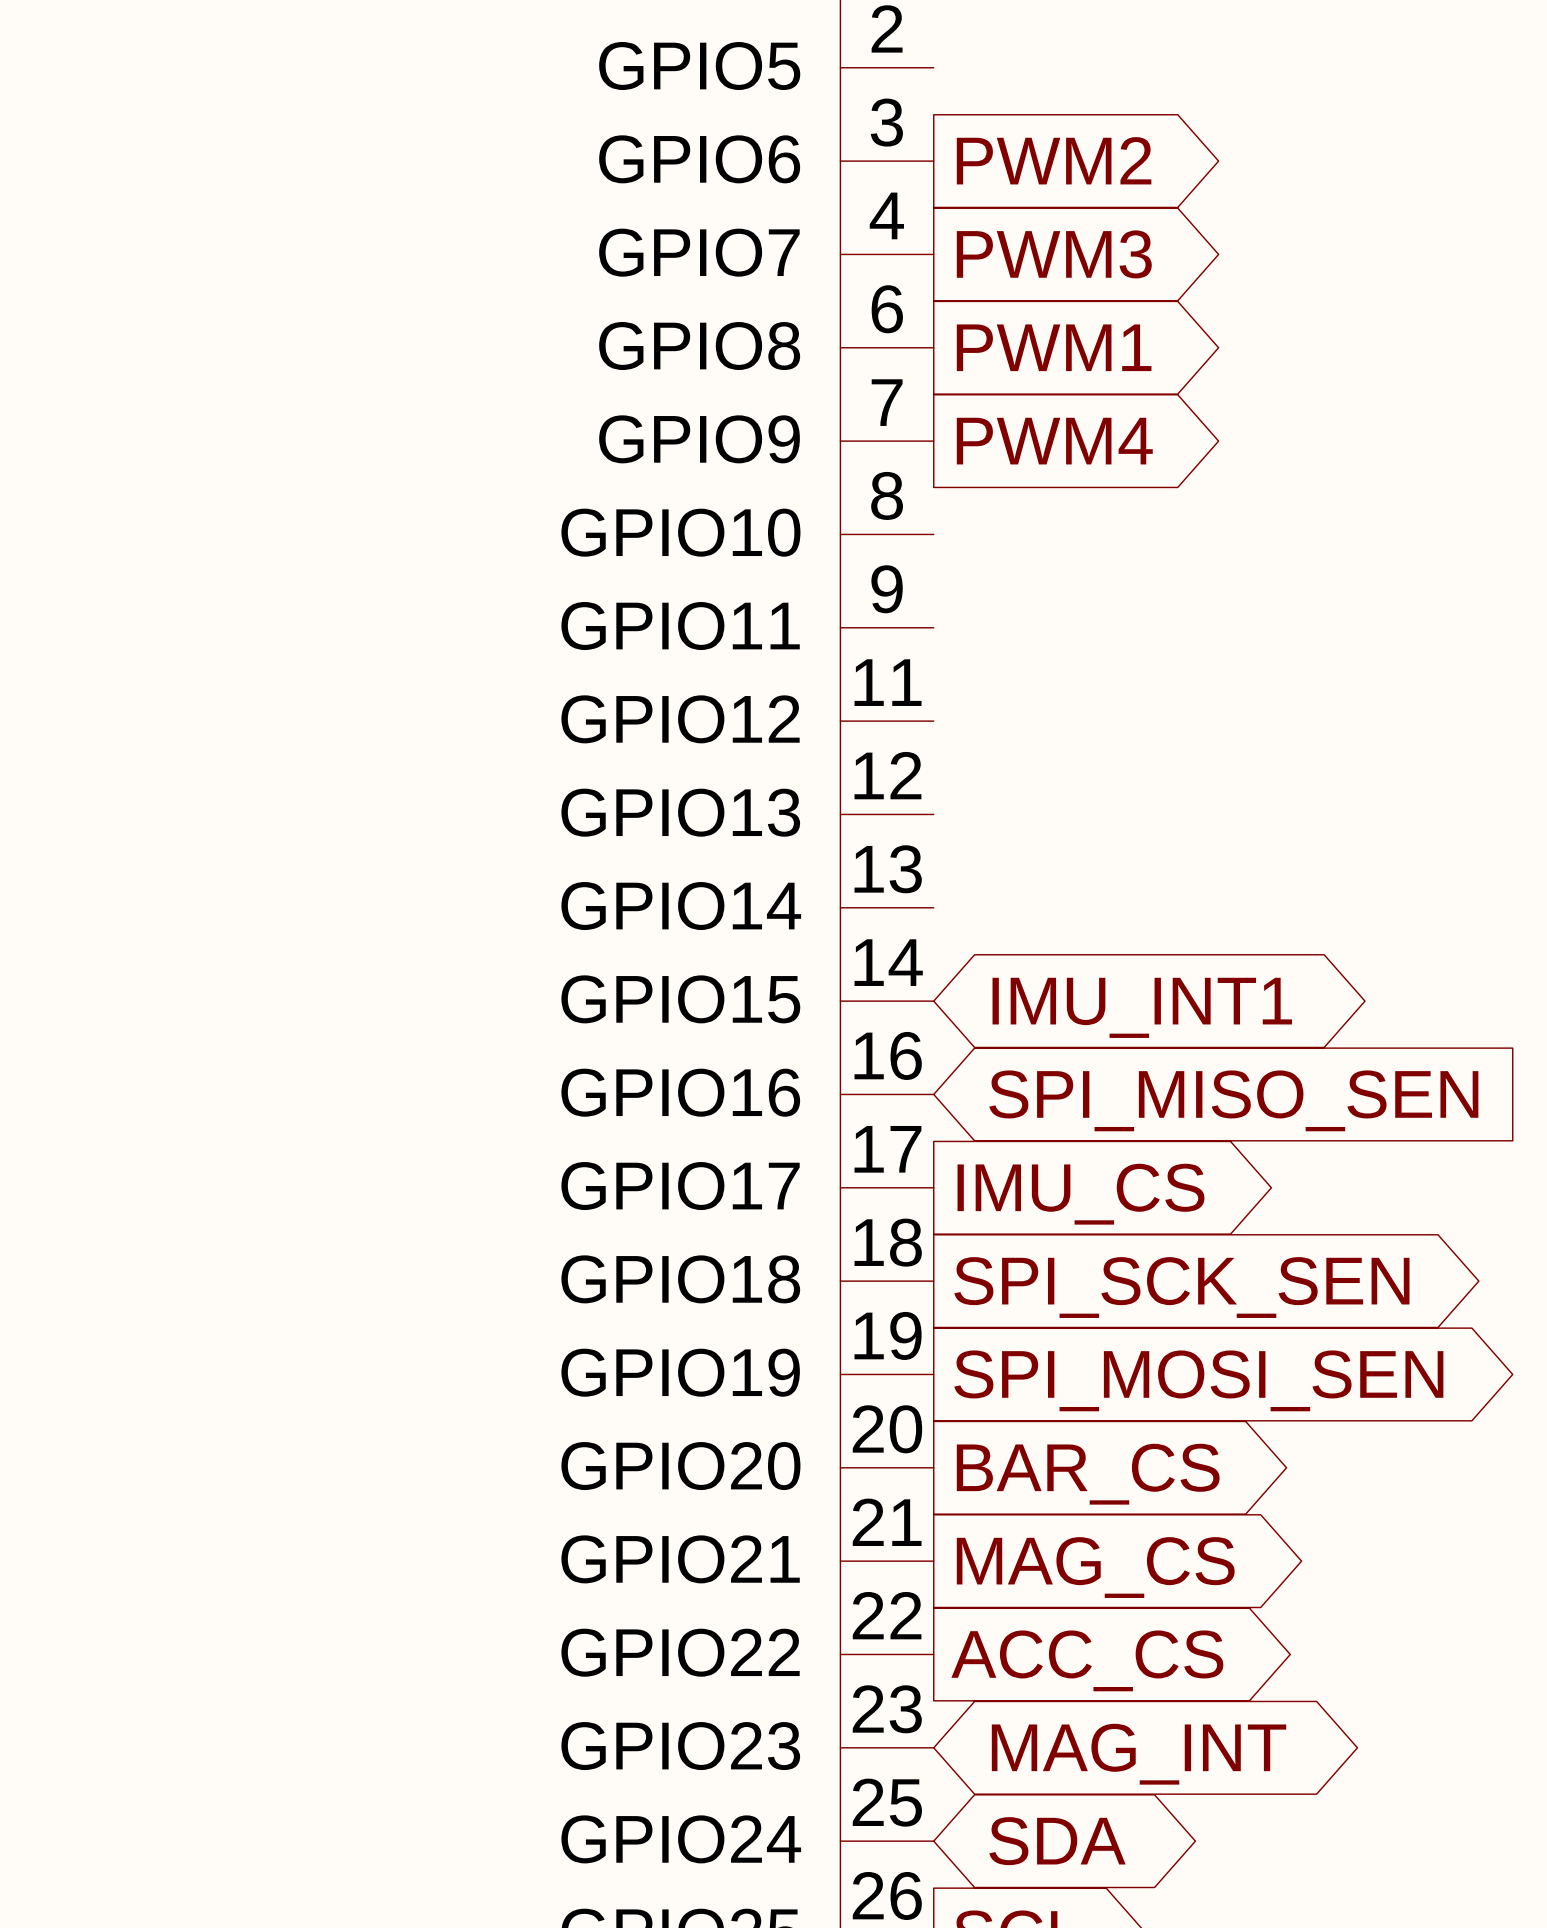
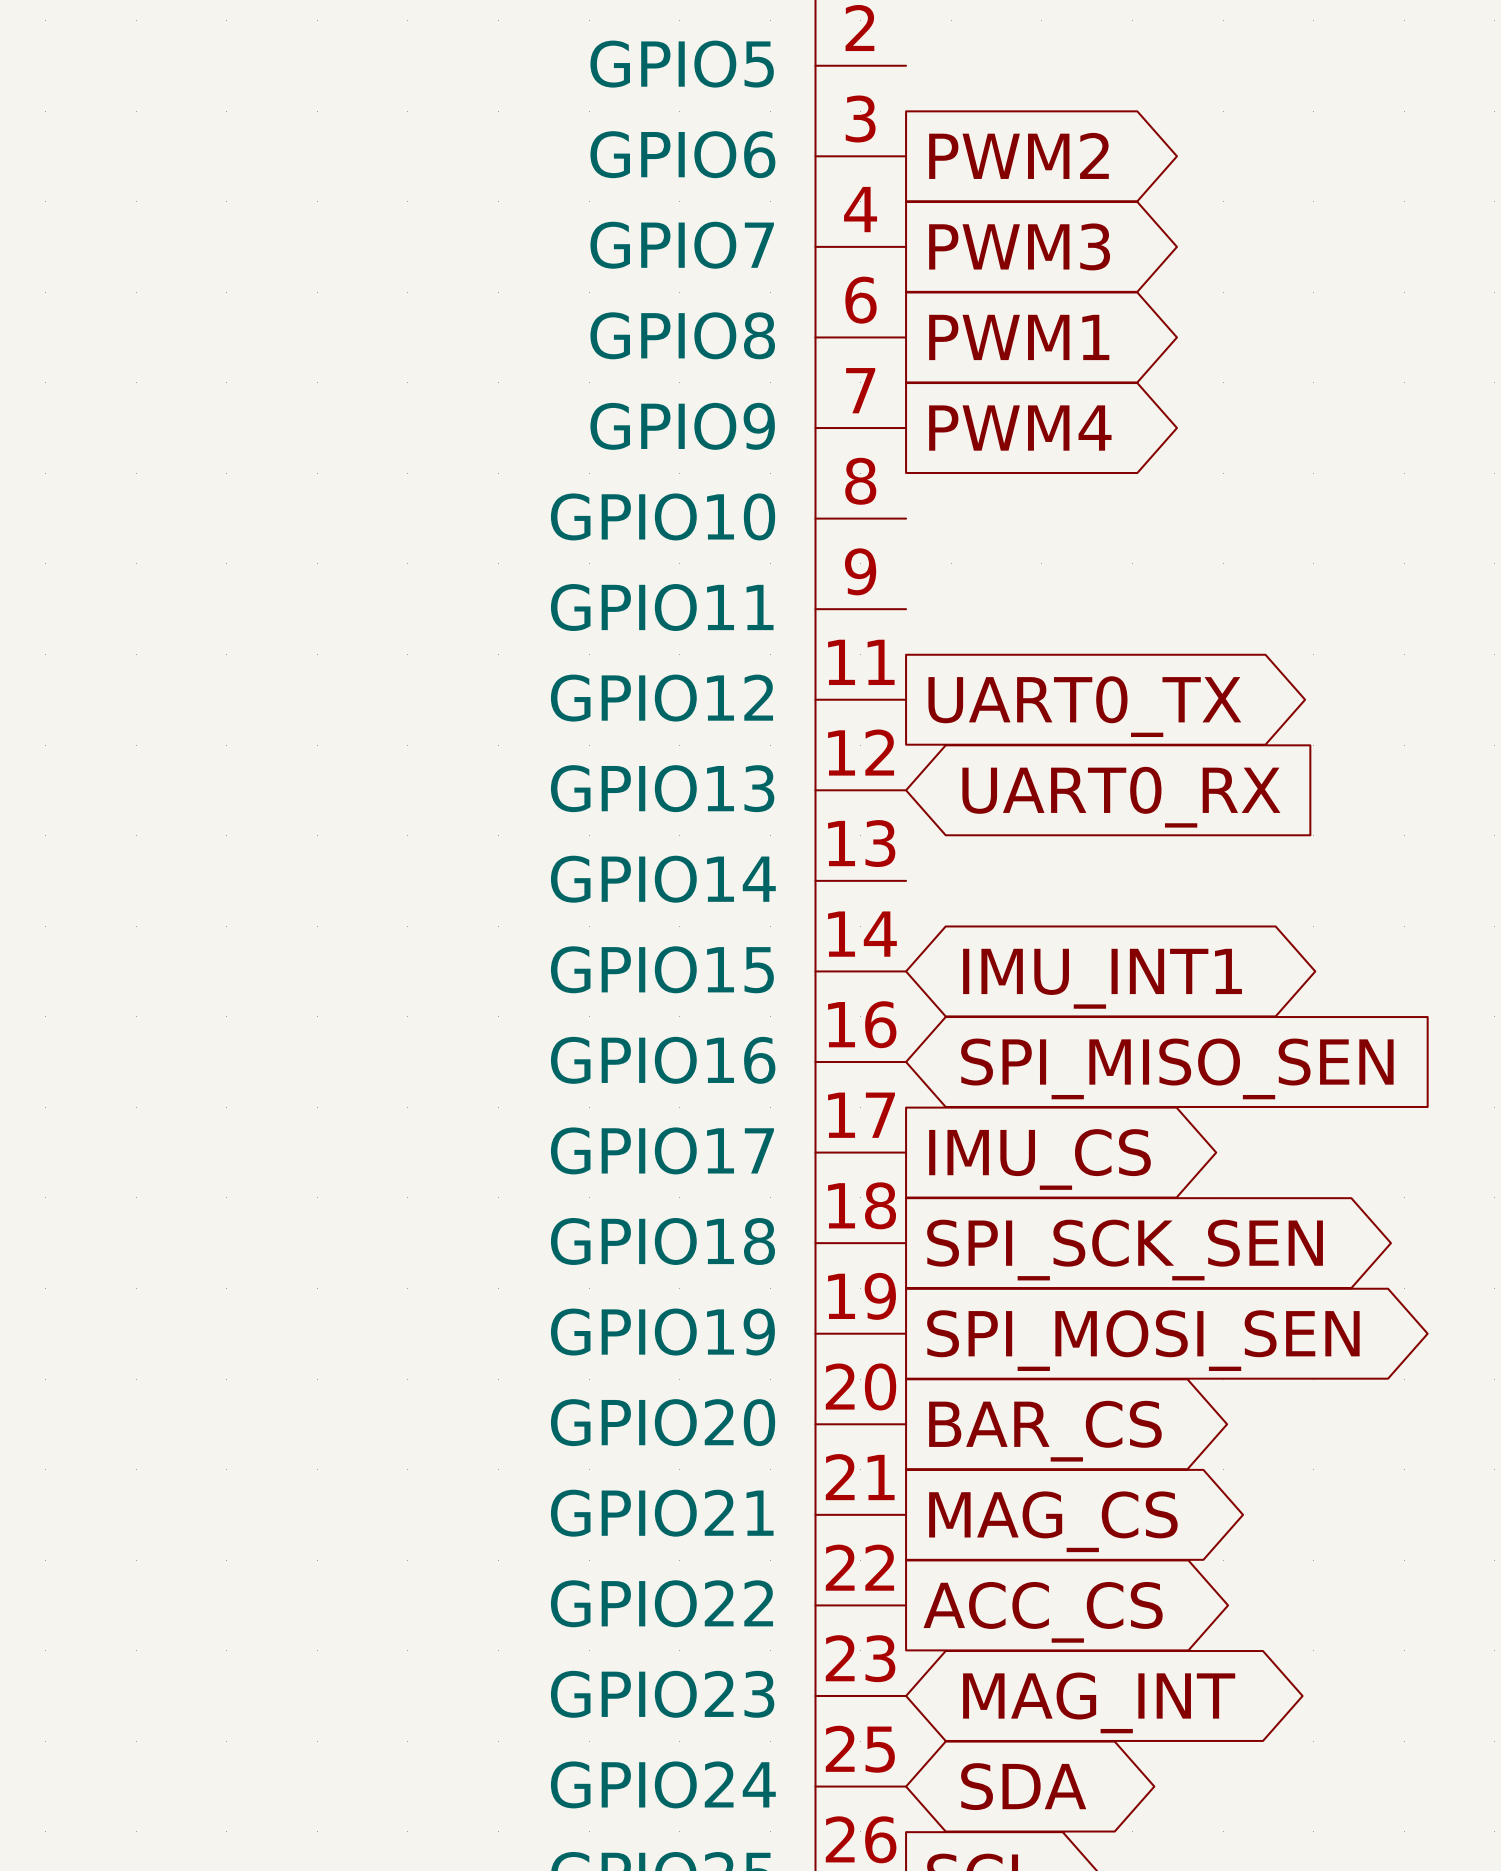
global label: none -> UART0_TX (1084, 706)
global label: none -> UART0_RX (1121, 797)

